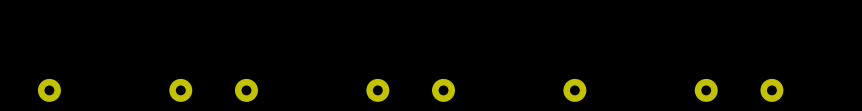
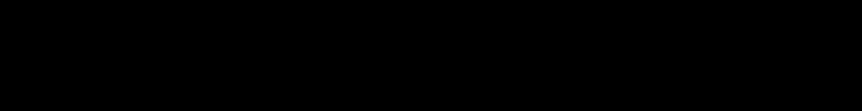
part: (49, 90) -> none
part: (180, 90) -> none
part: (246, 90) -> none
part: (377, 90) -> none
part: (443, 90) -> none
part: (574, 90) -> none
part: (706, 90) -> none
part: (771, 90) -> none

